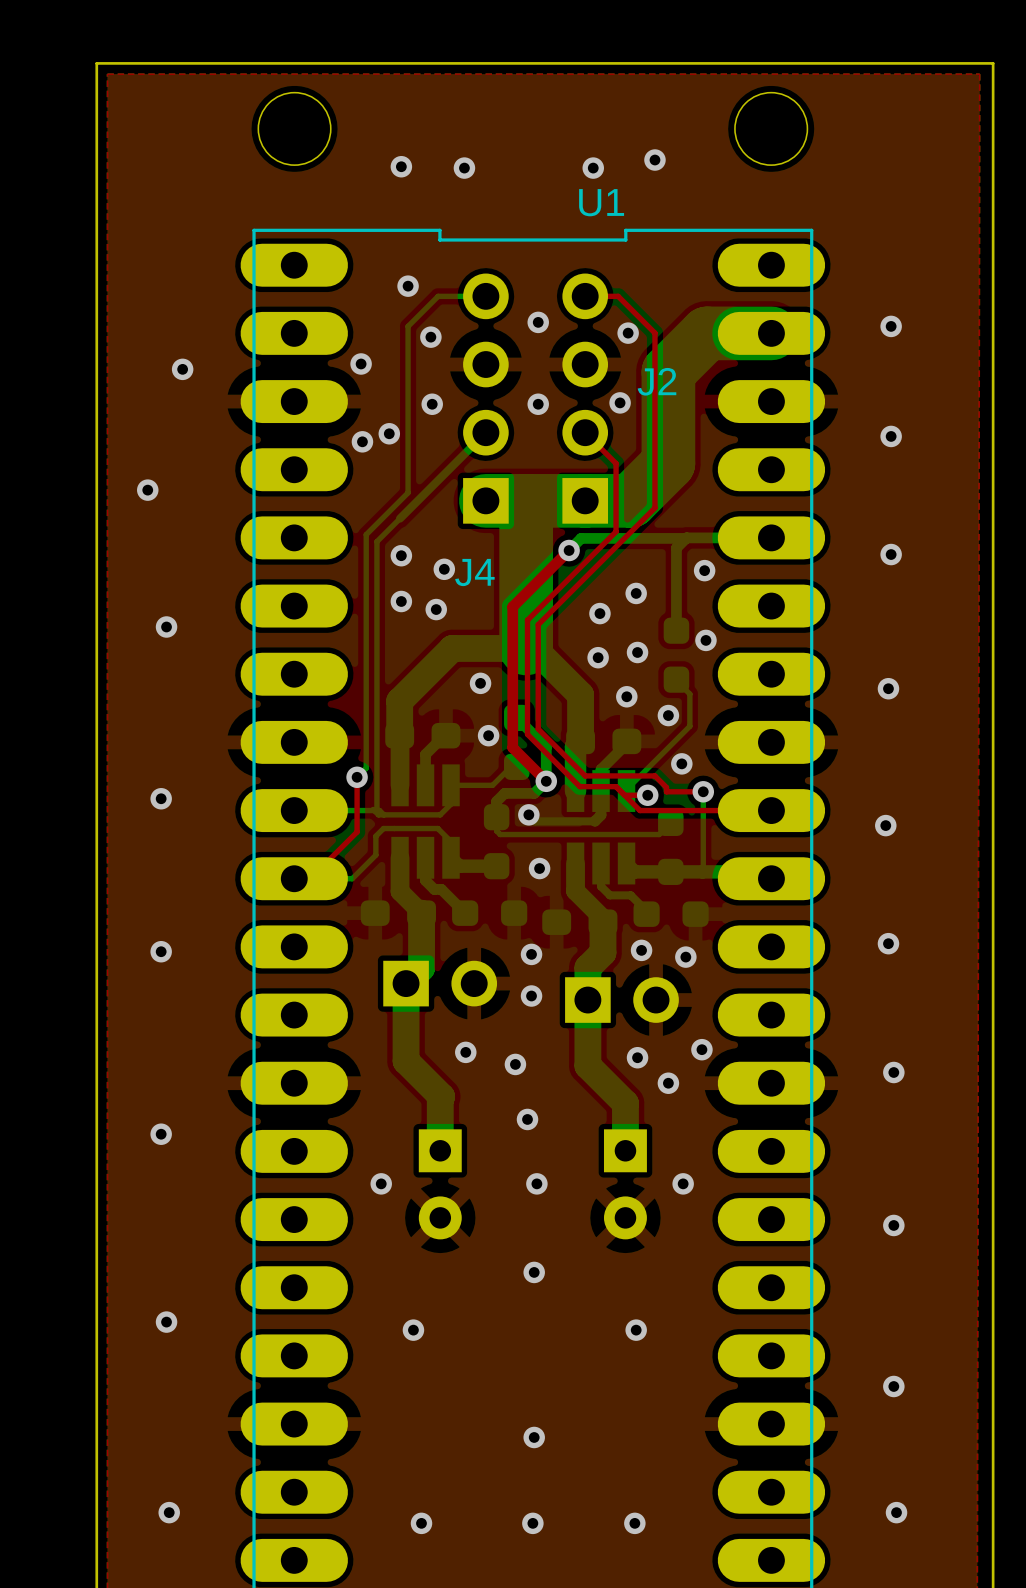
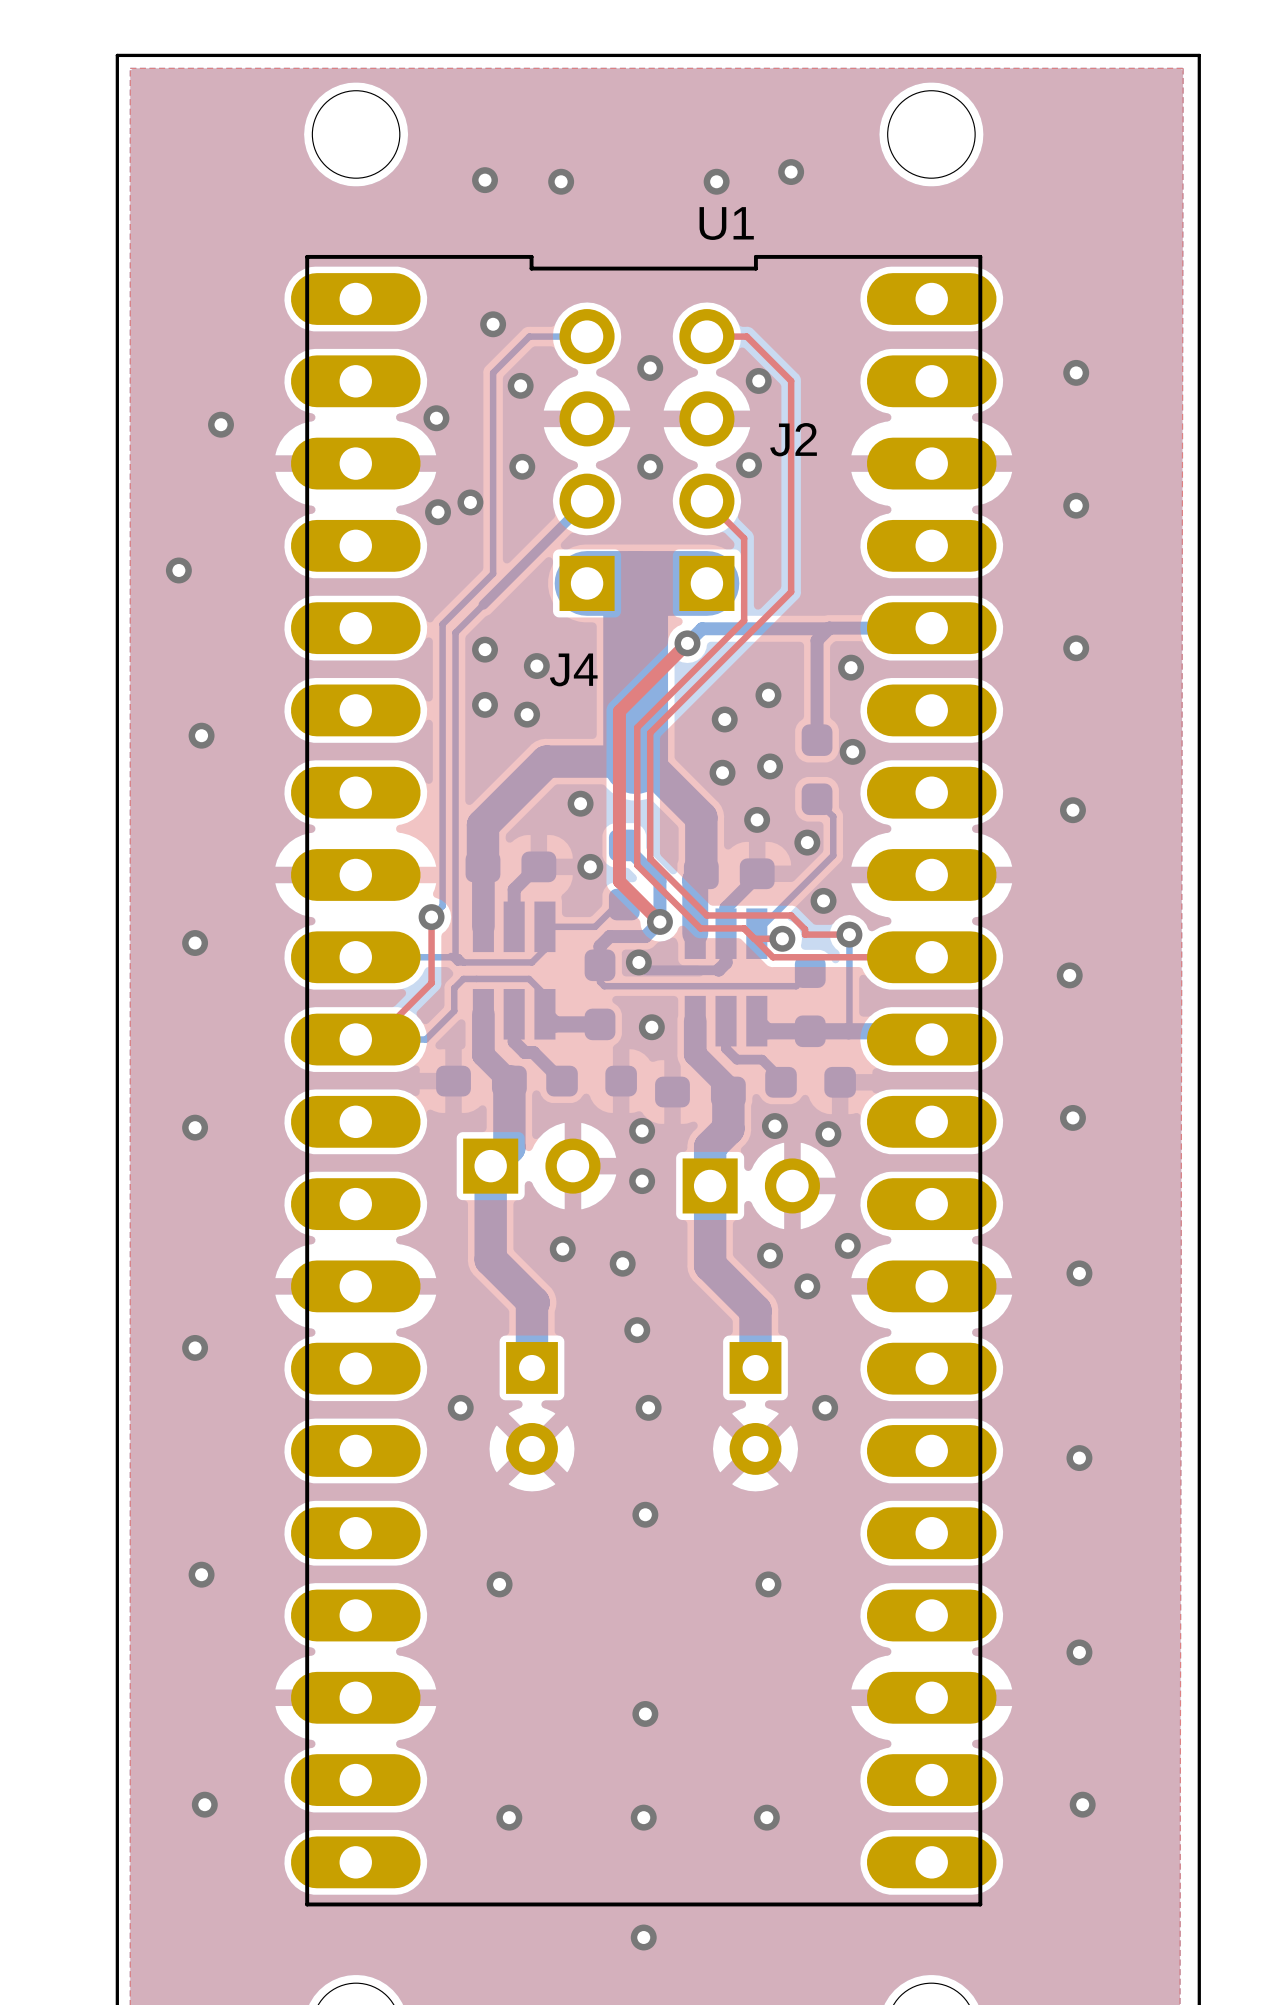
bottom track: (771, 333) (707, 333) (668, 372) (668, 463) (630, 500) (585, 500) -> none

